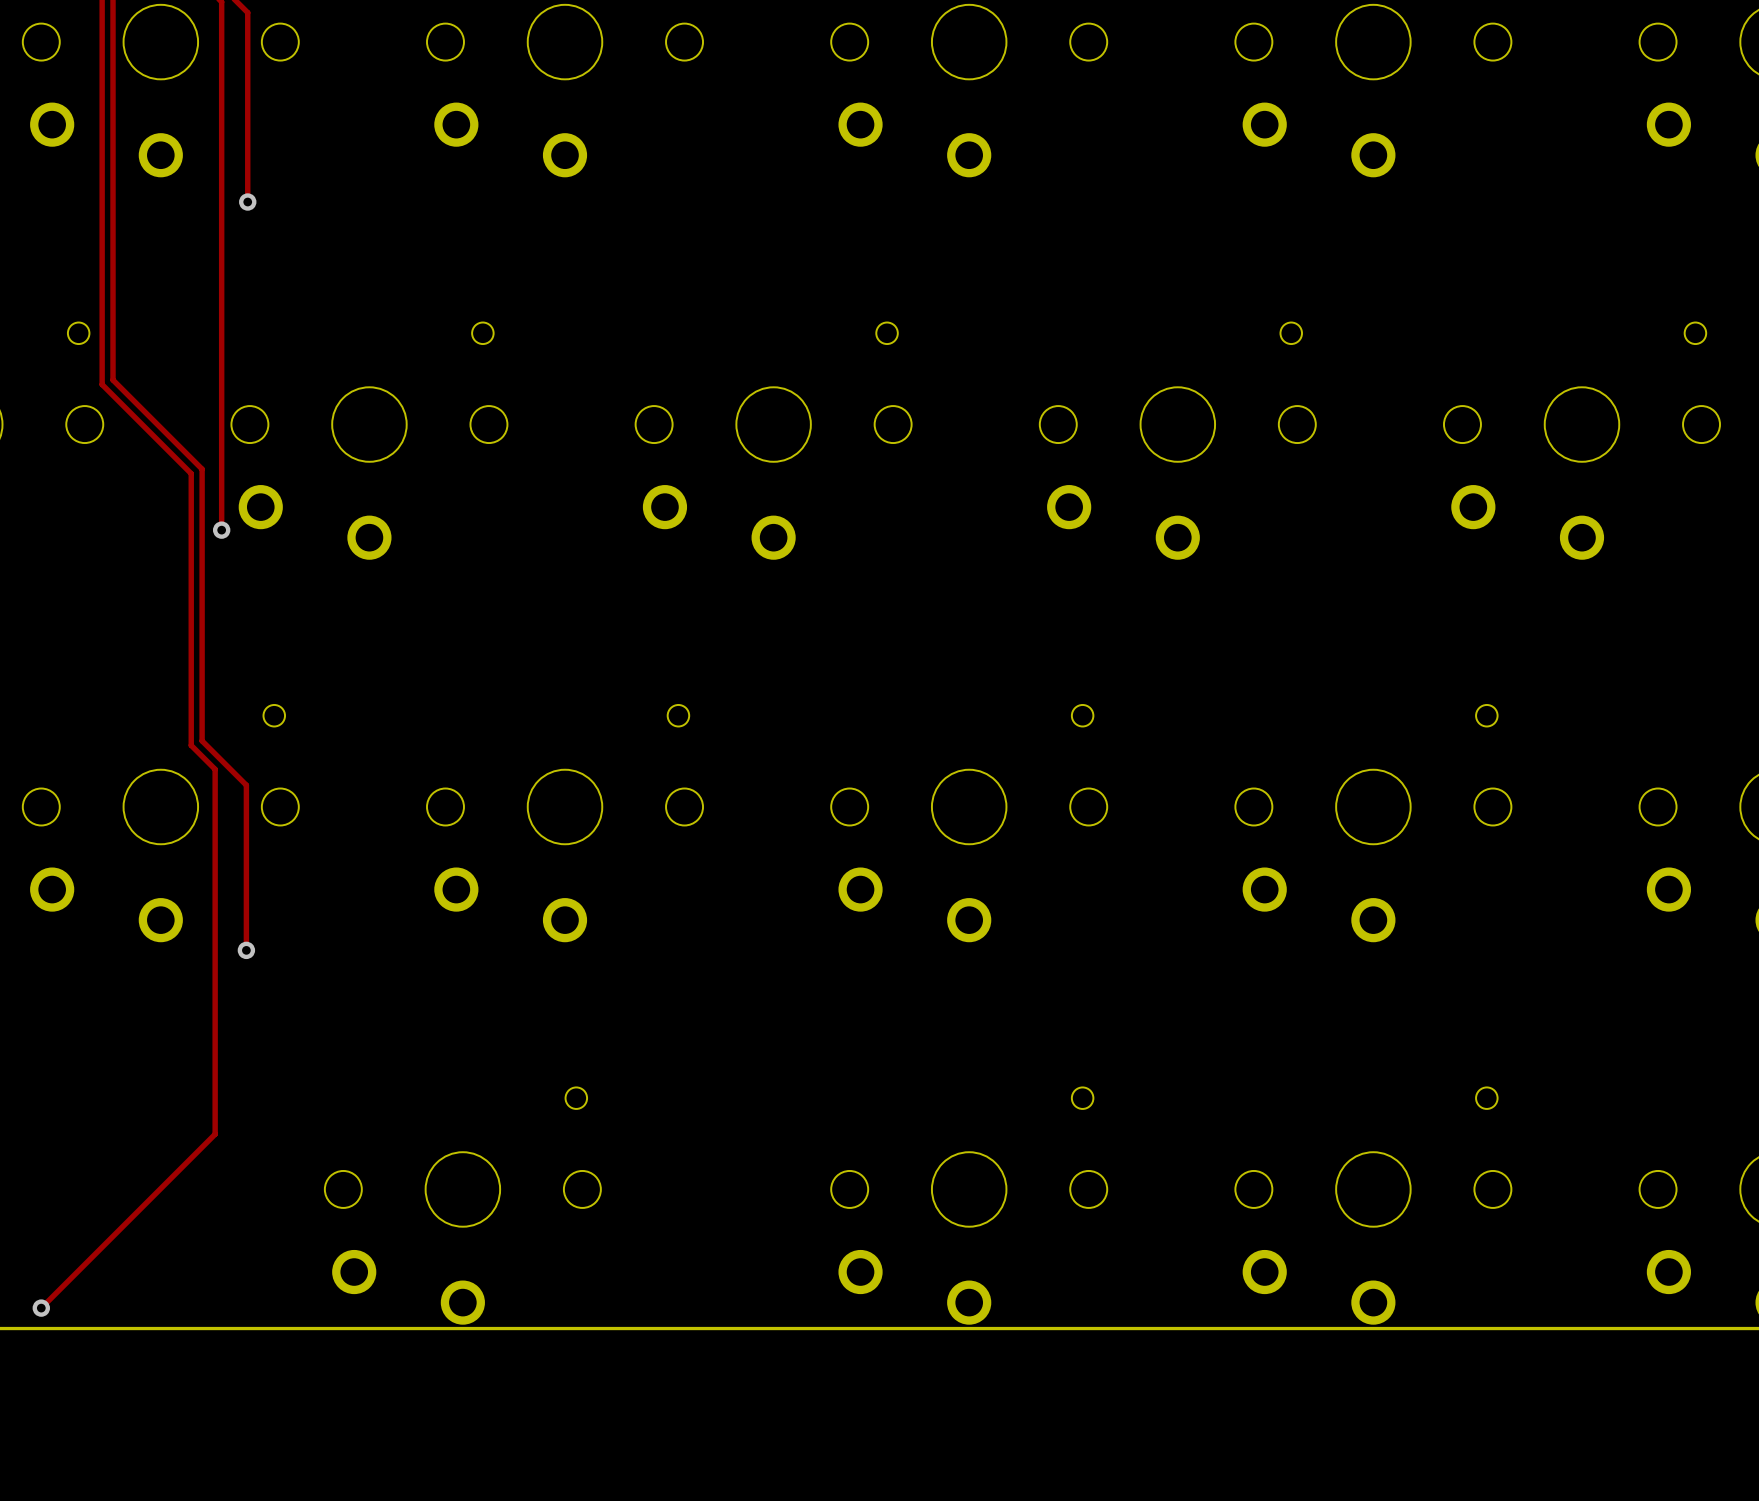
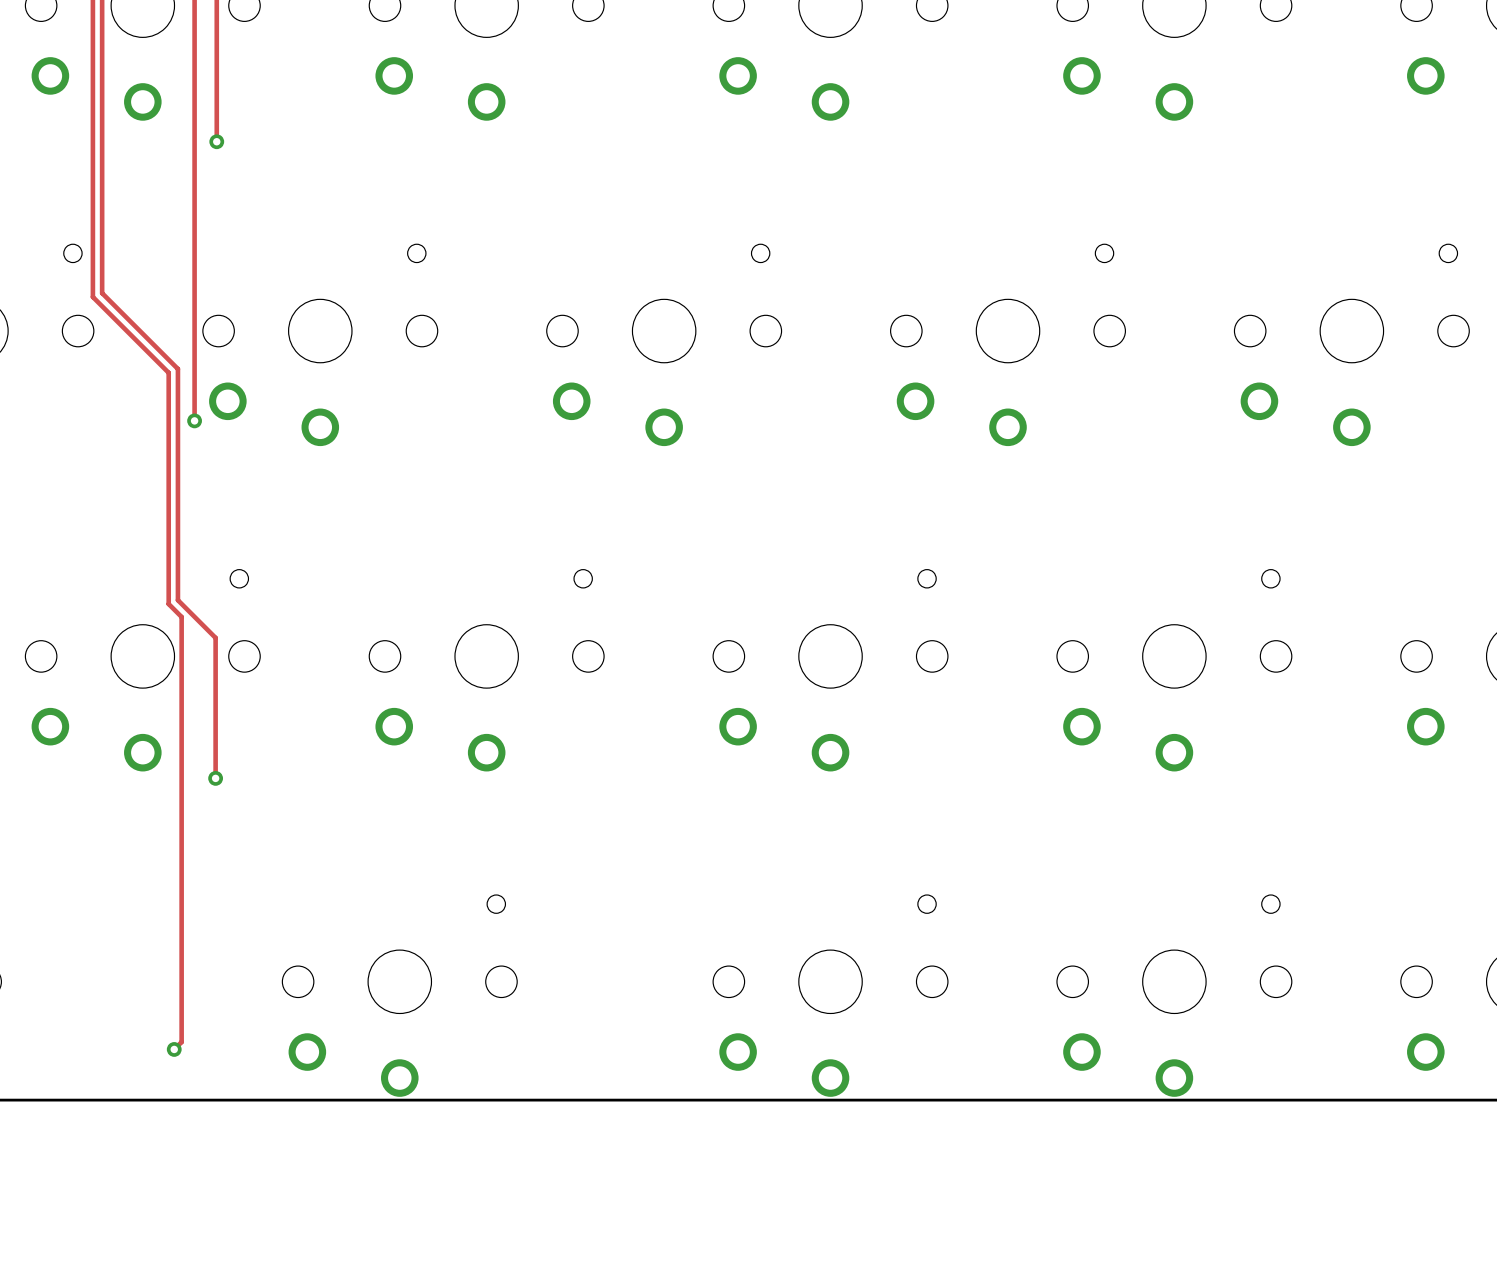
track: (206, 760) (215, 769) (215, 1134) (41, 1308) -> (181, 616) (181, 1042) (174, 1049)
via: none -> (174, 1049)
via: (41, 1308) -> none

